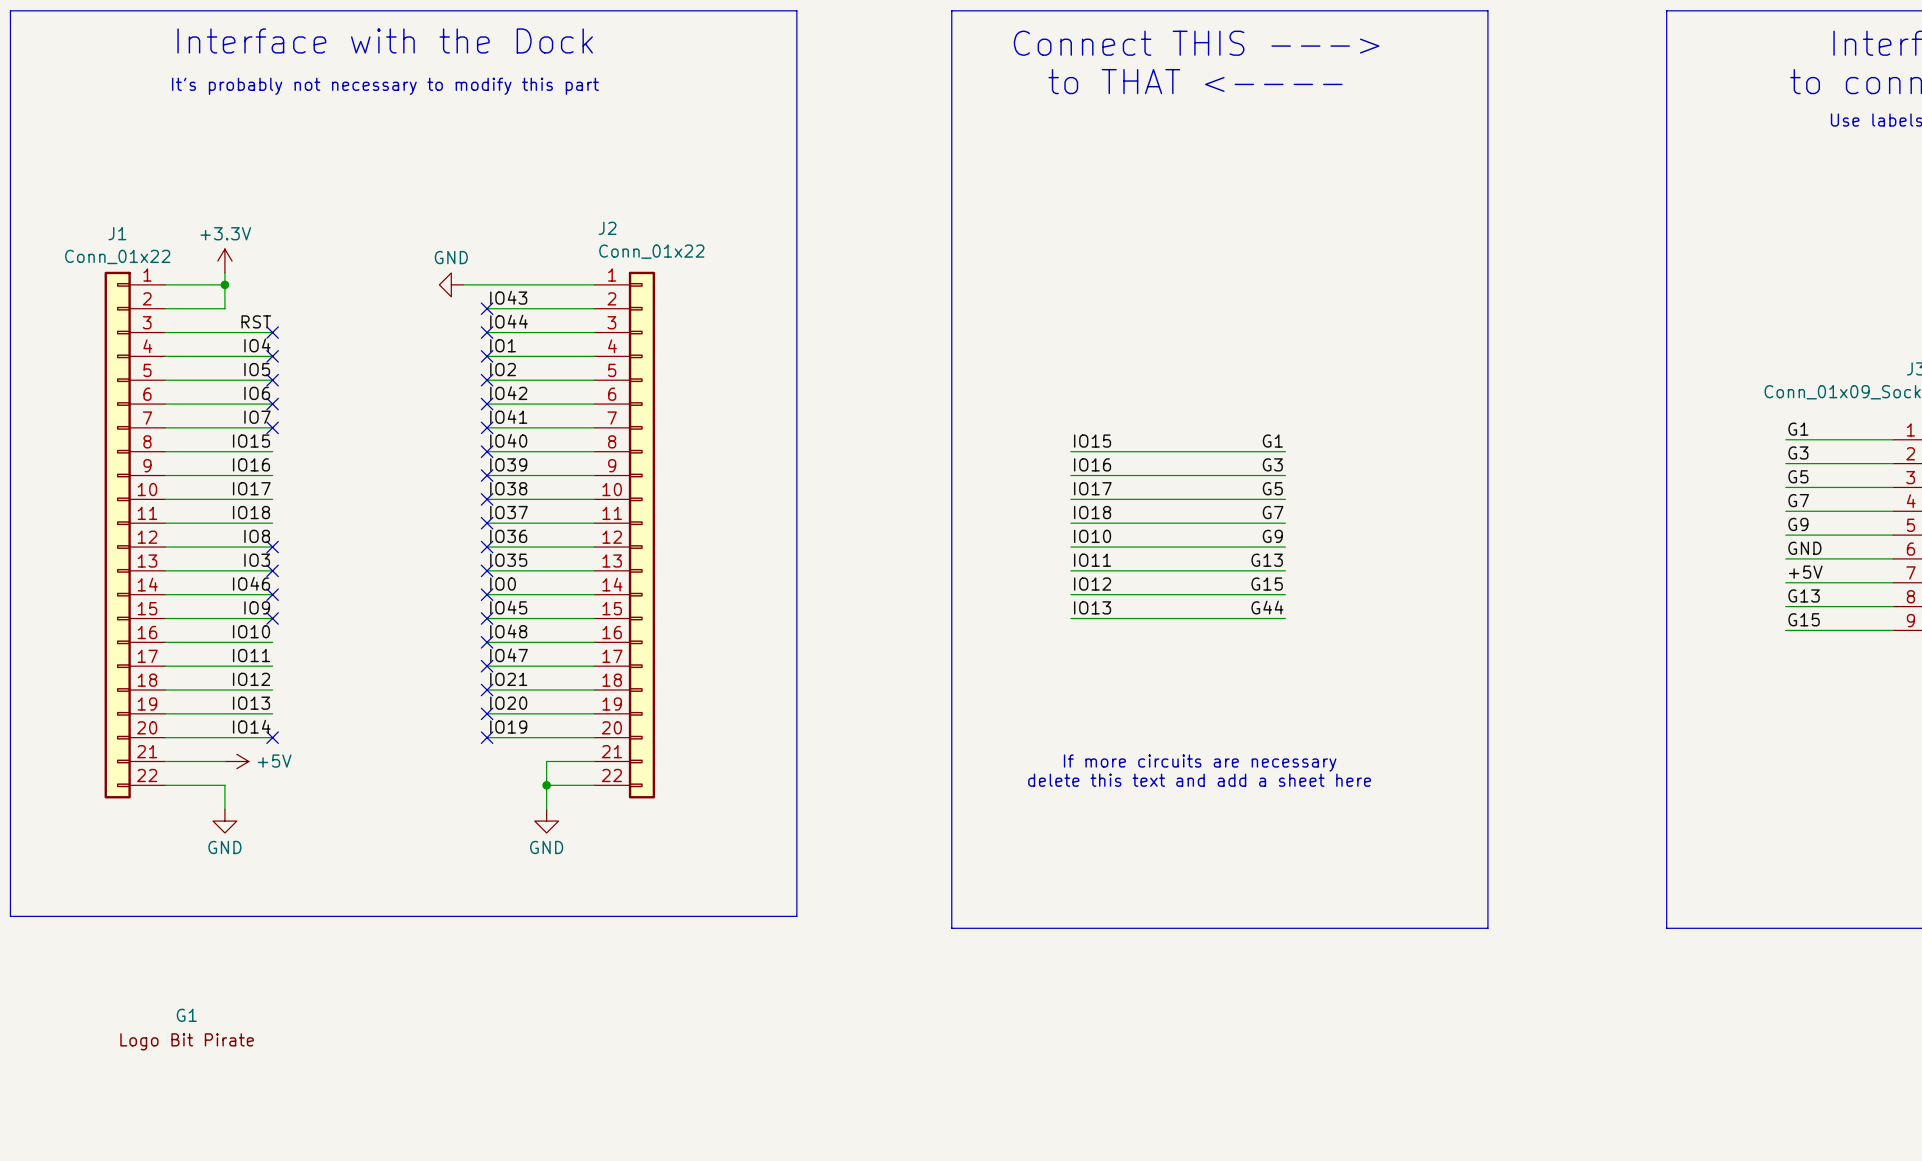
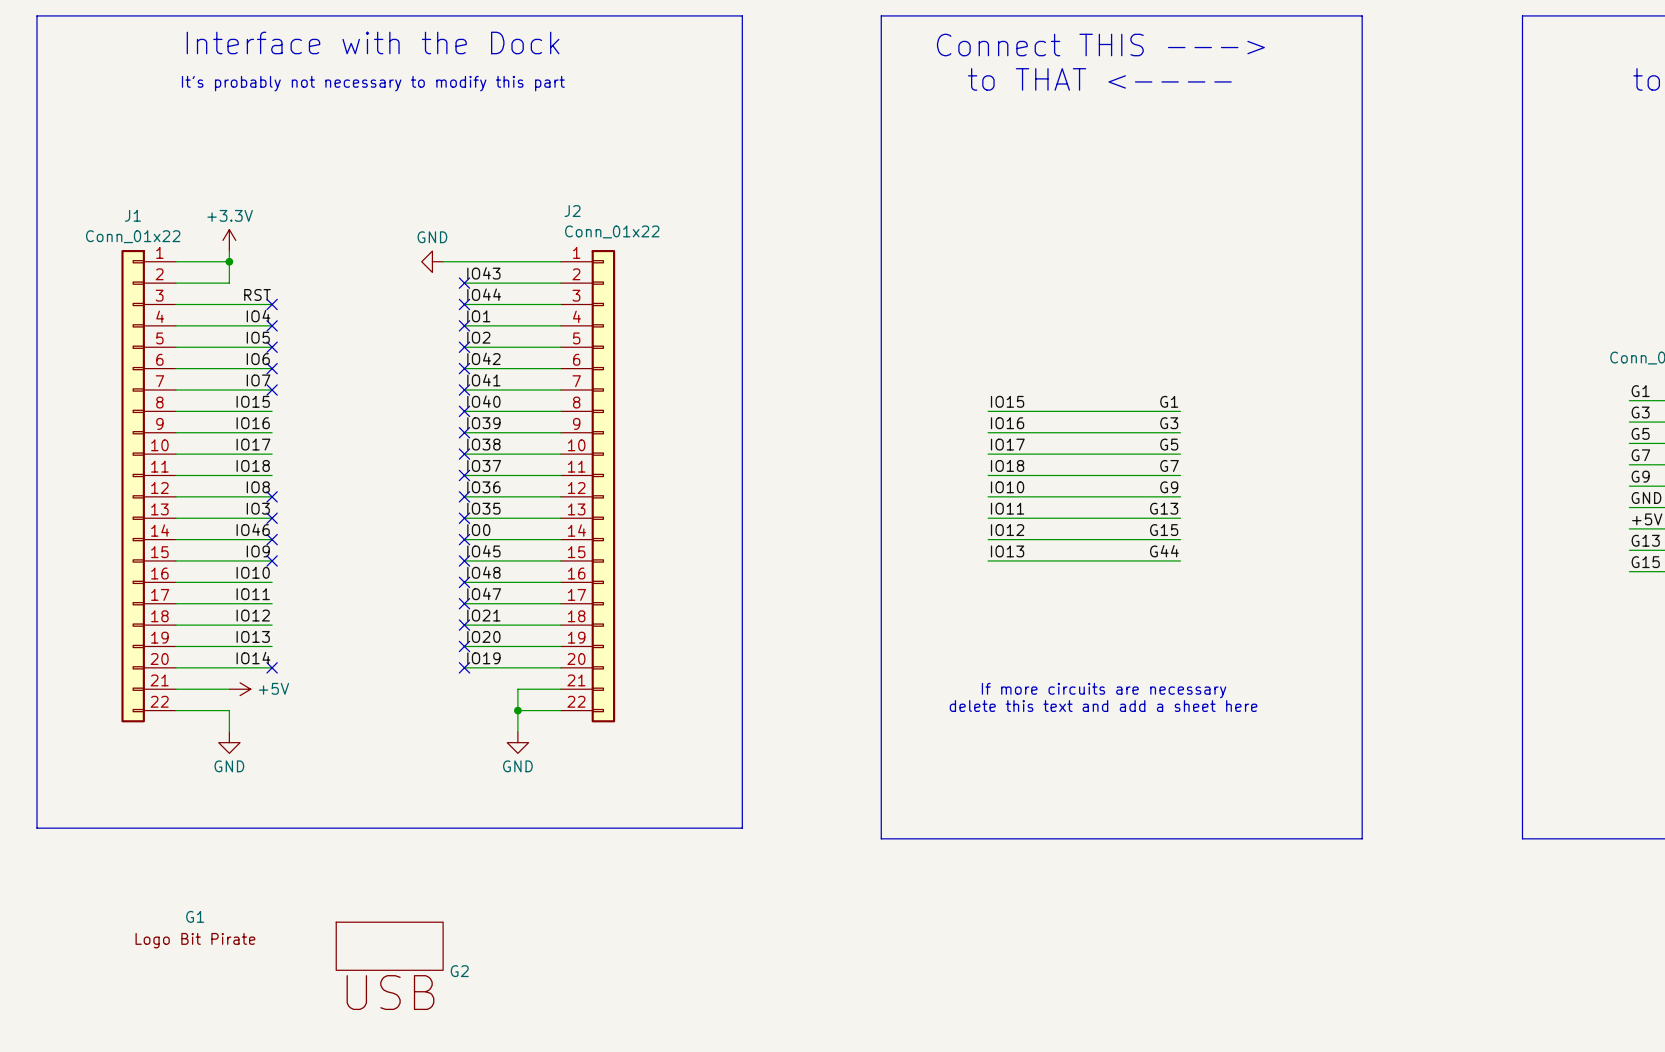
G2: none -> (389, 946)

